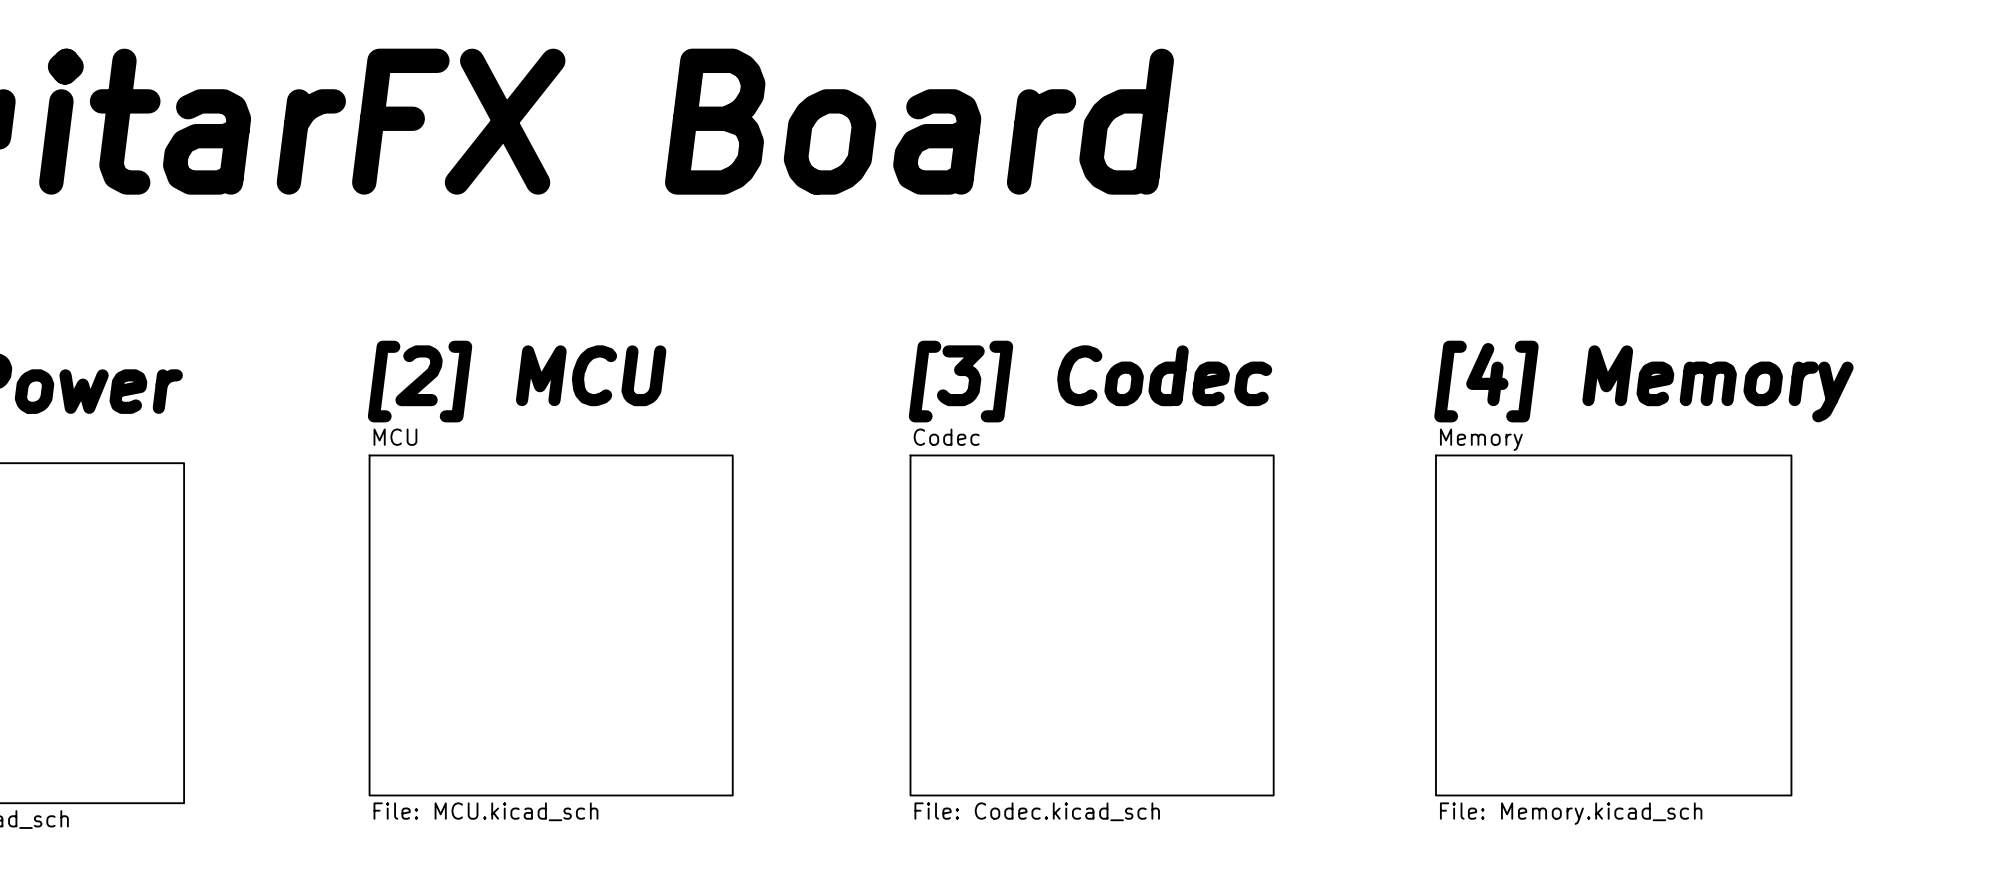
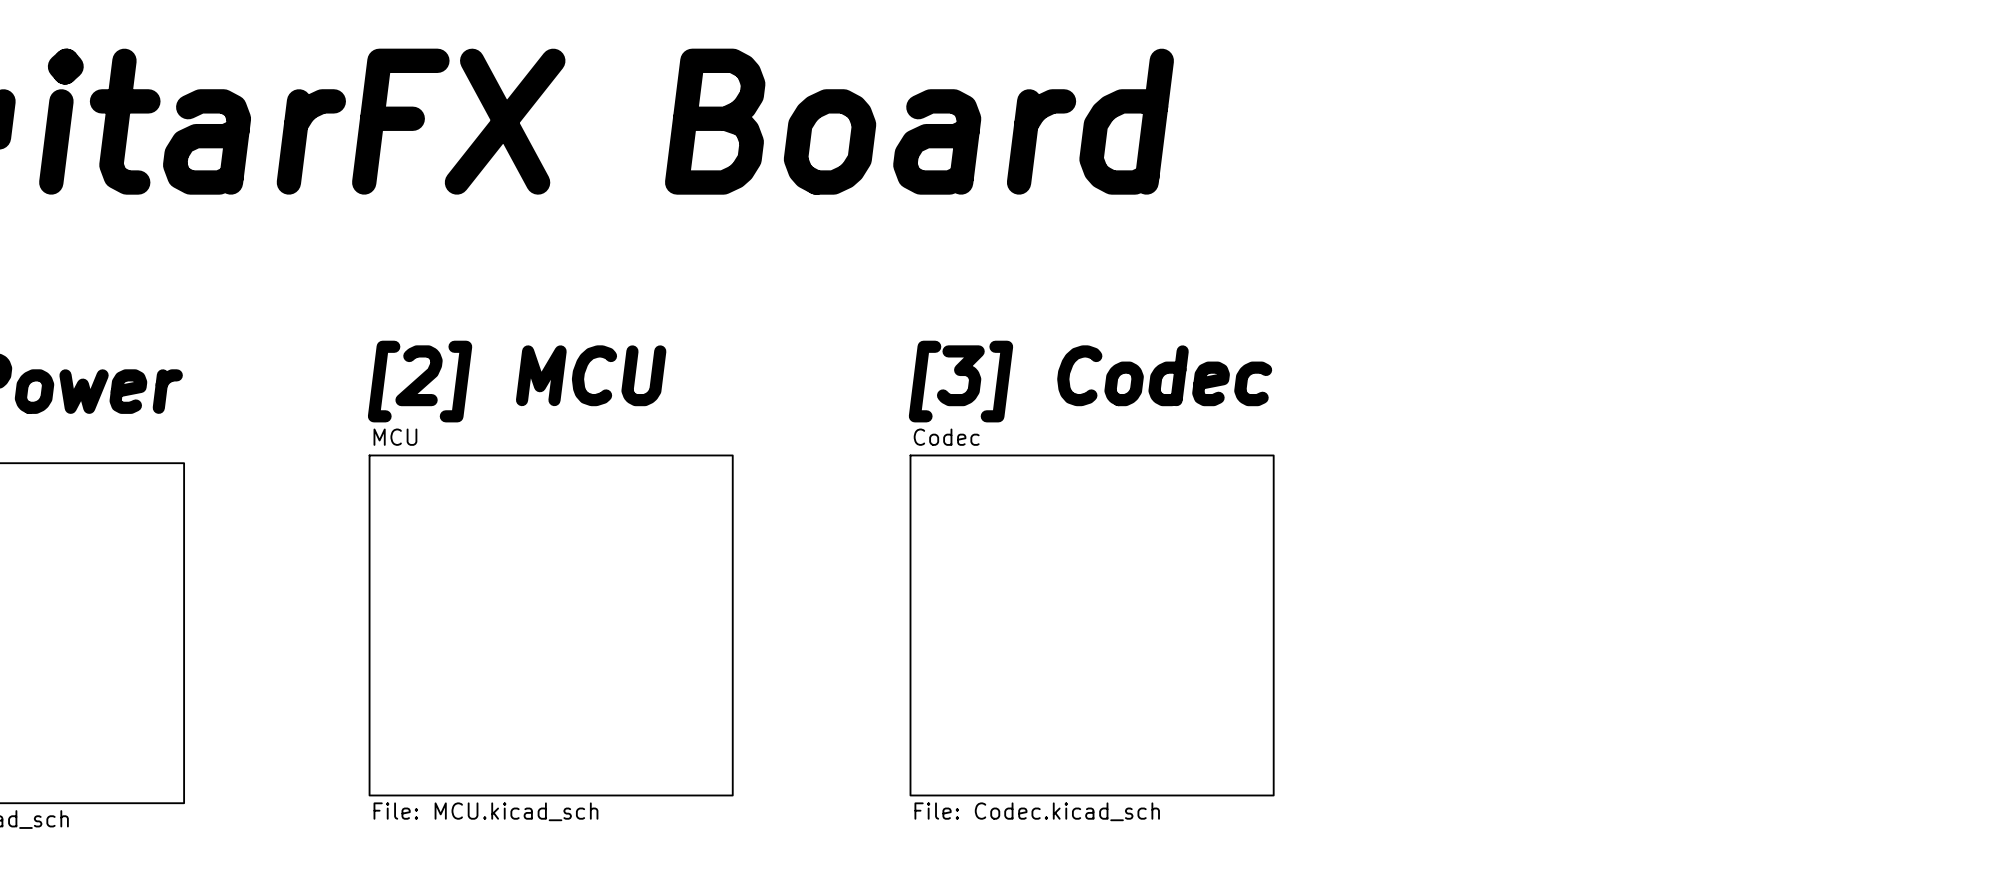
text: [4] Memory (1643, 381) -> none
sheet Memory: File: Memory.kicad_sch (1613, 625) -> none

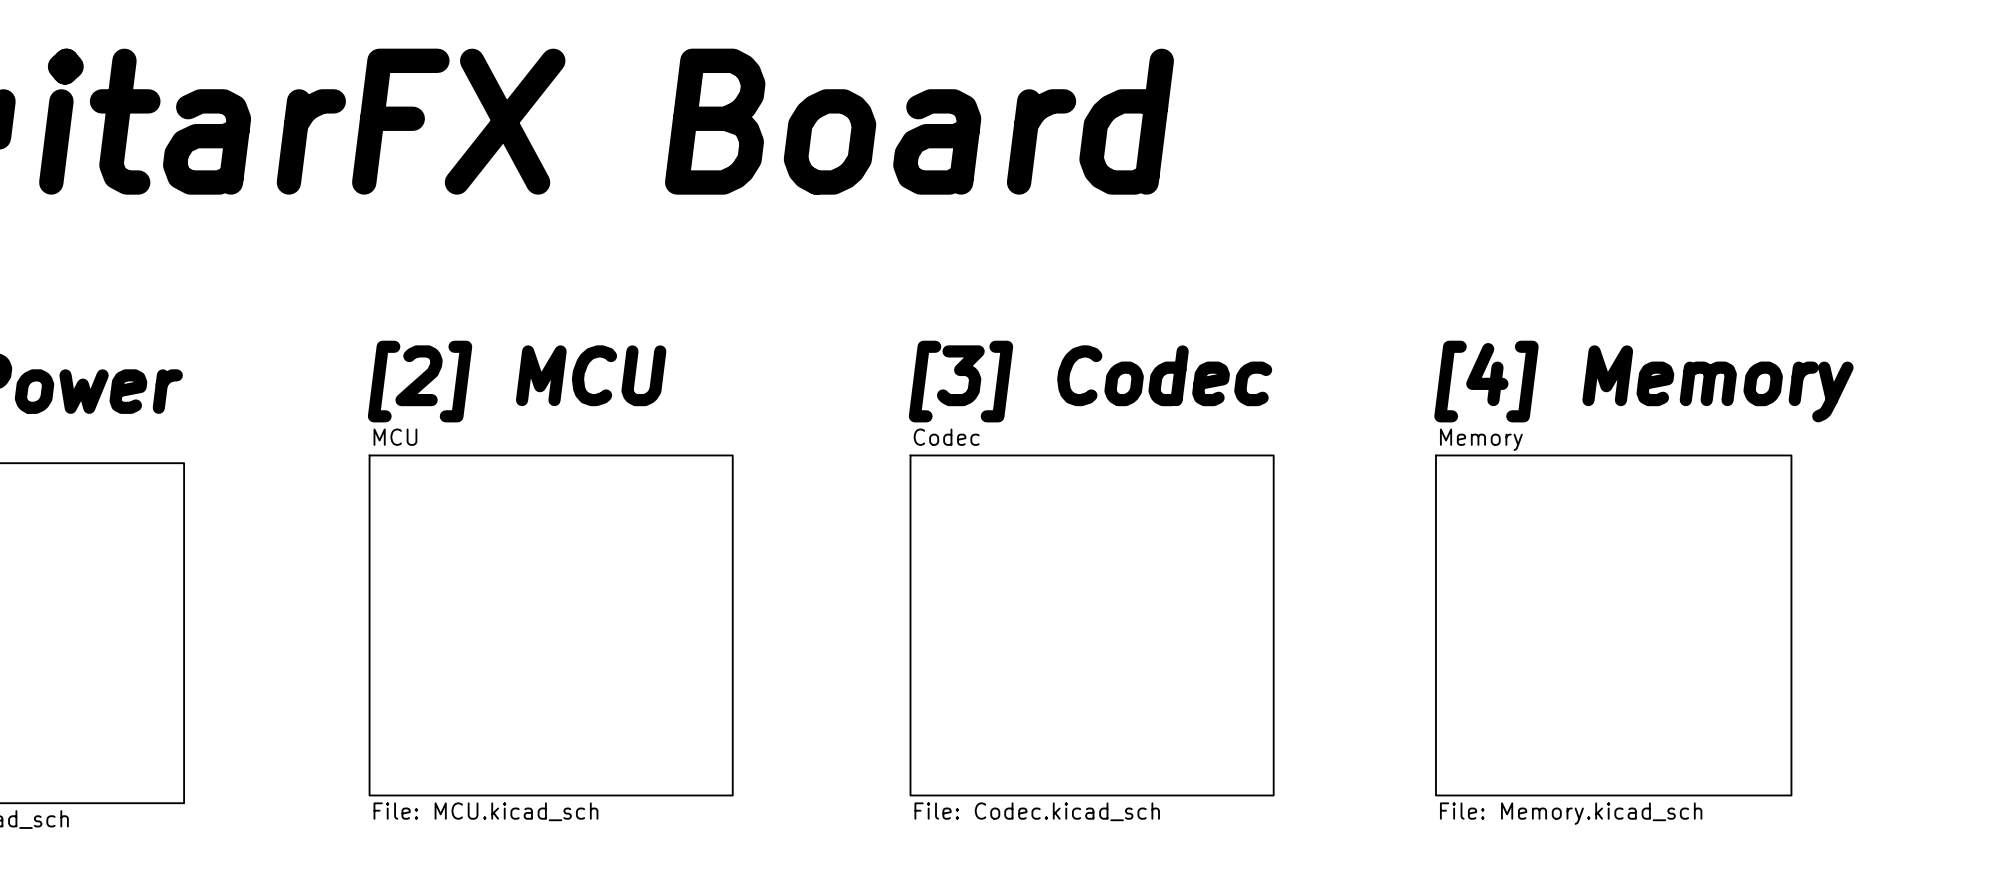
text: none -> [4] Memory (1643, 381)
sheet Memory: none -> File: Memory.kicad_sch (1613, 625)

